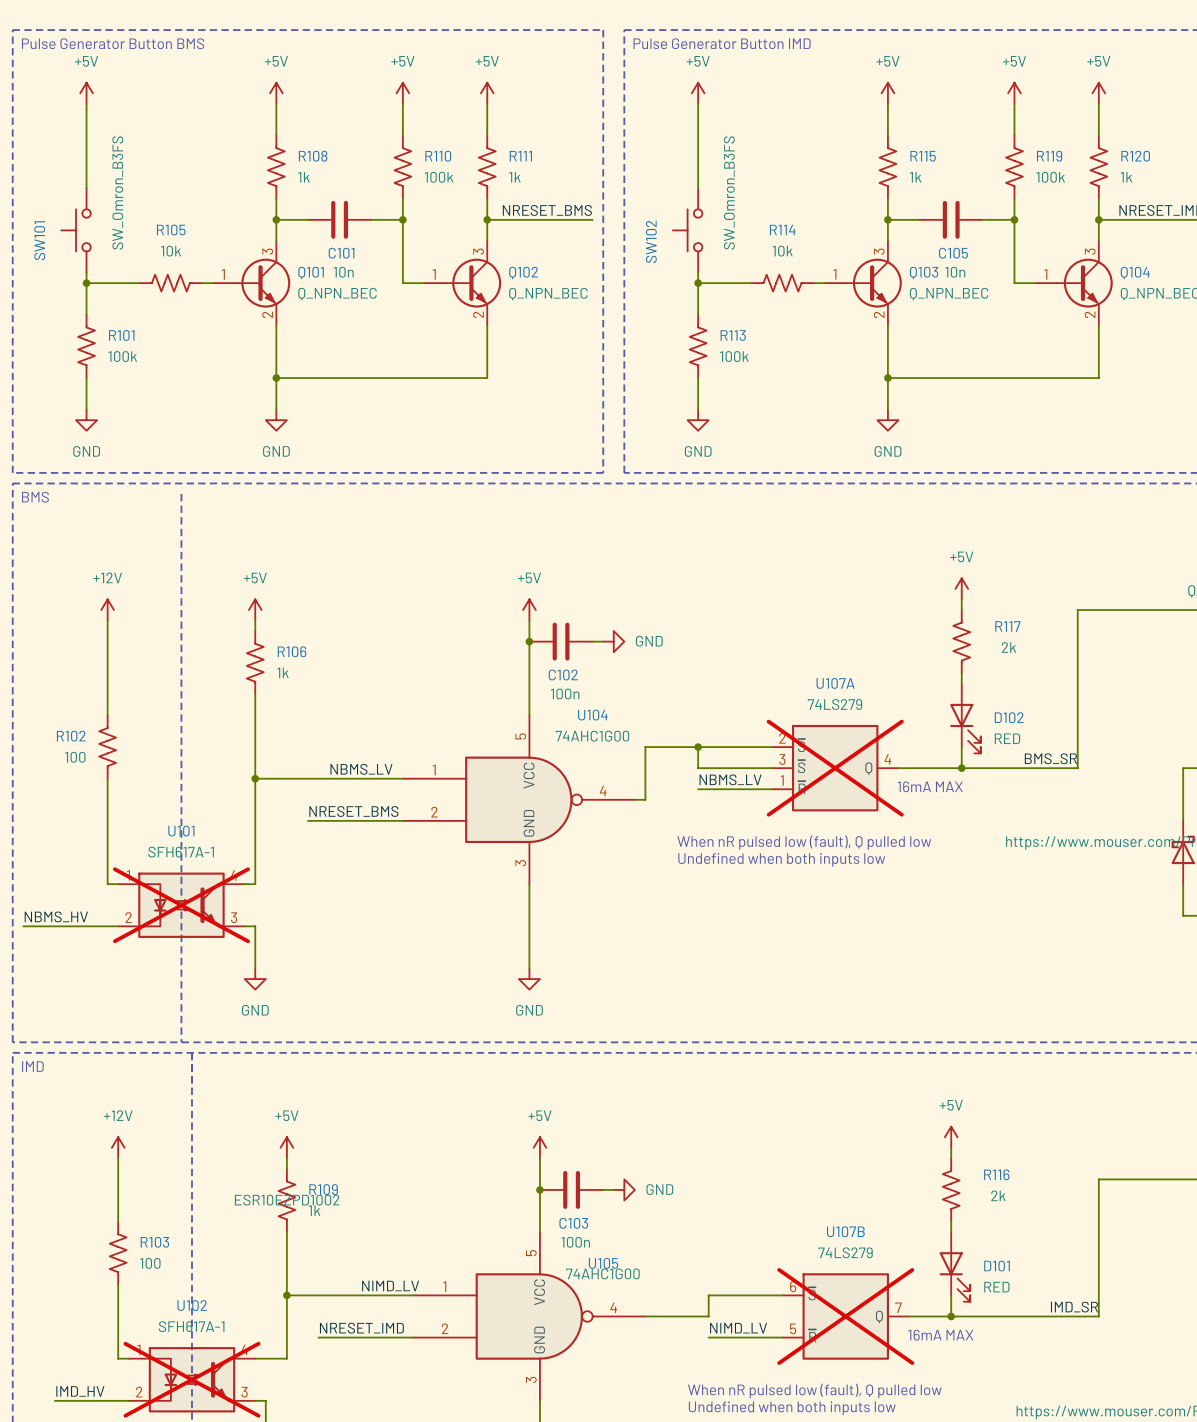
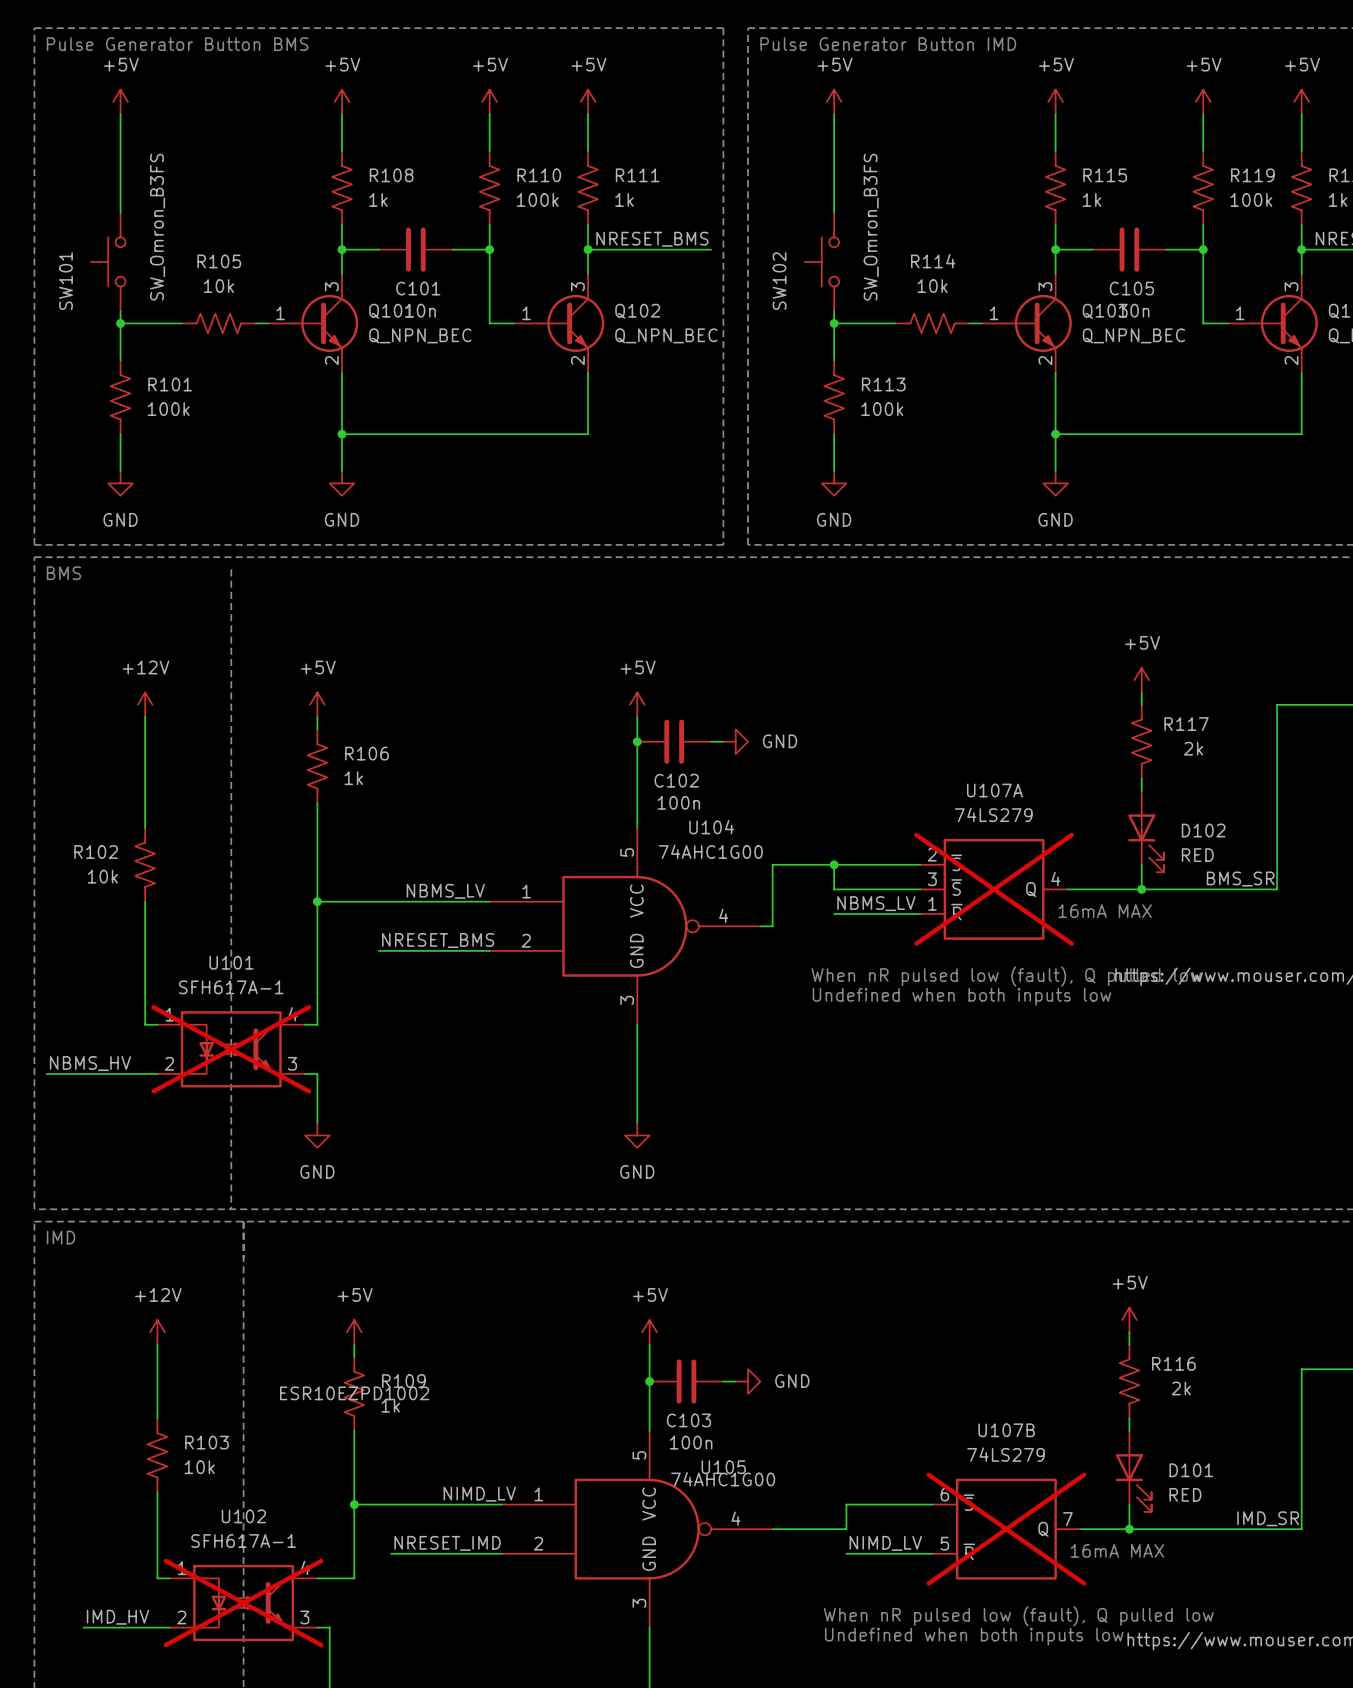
R102 value: 100 (75, 757) -> 10k (102, 876)
R103 value: 100 (150, 1263) -> 10k (199, 1467)

